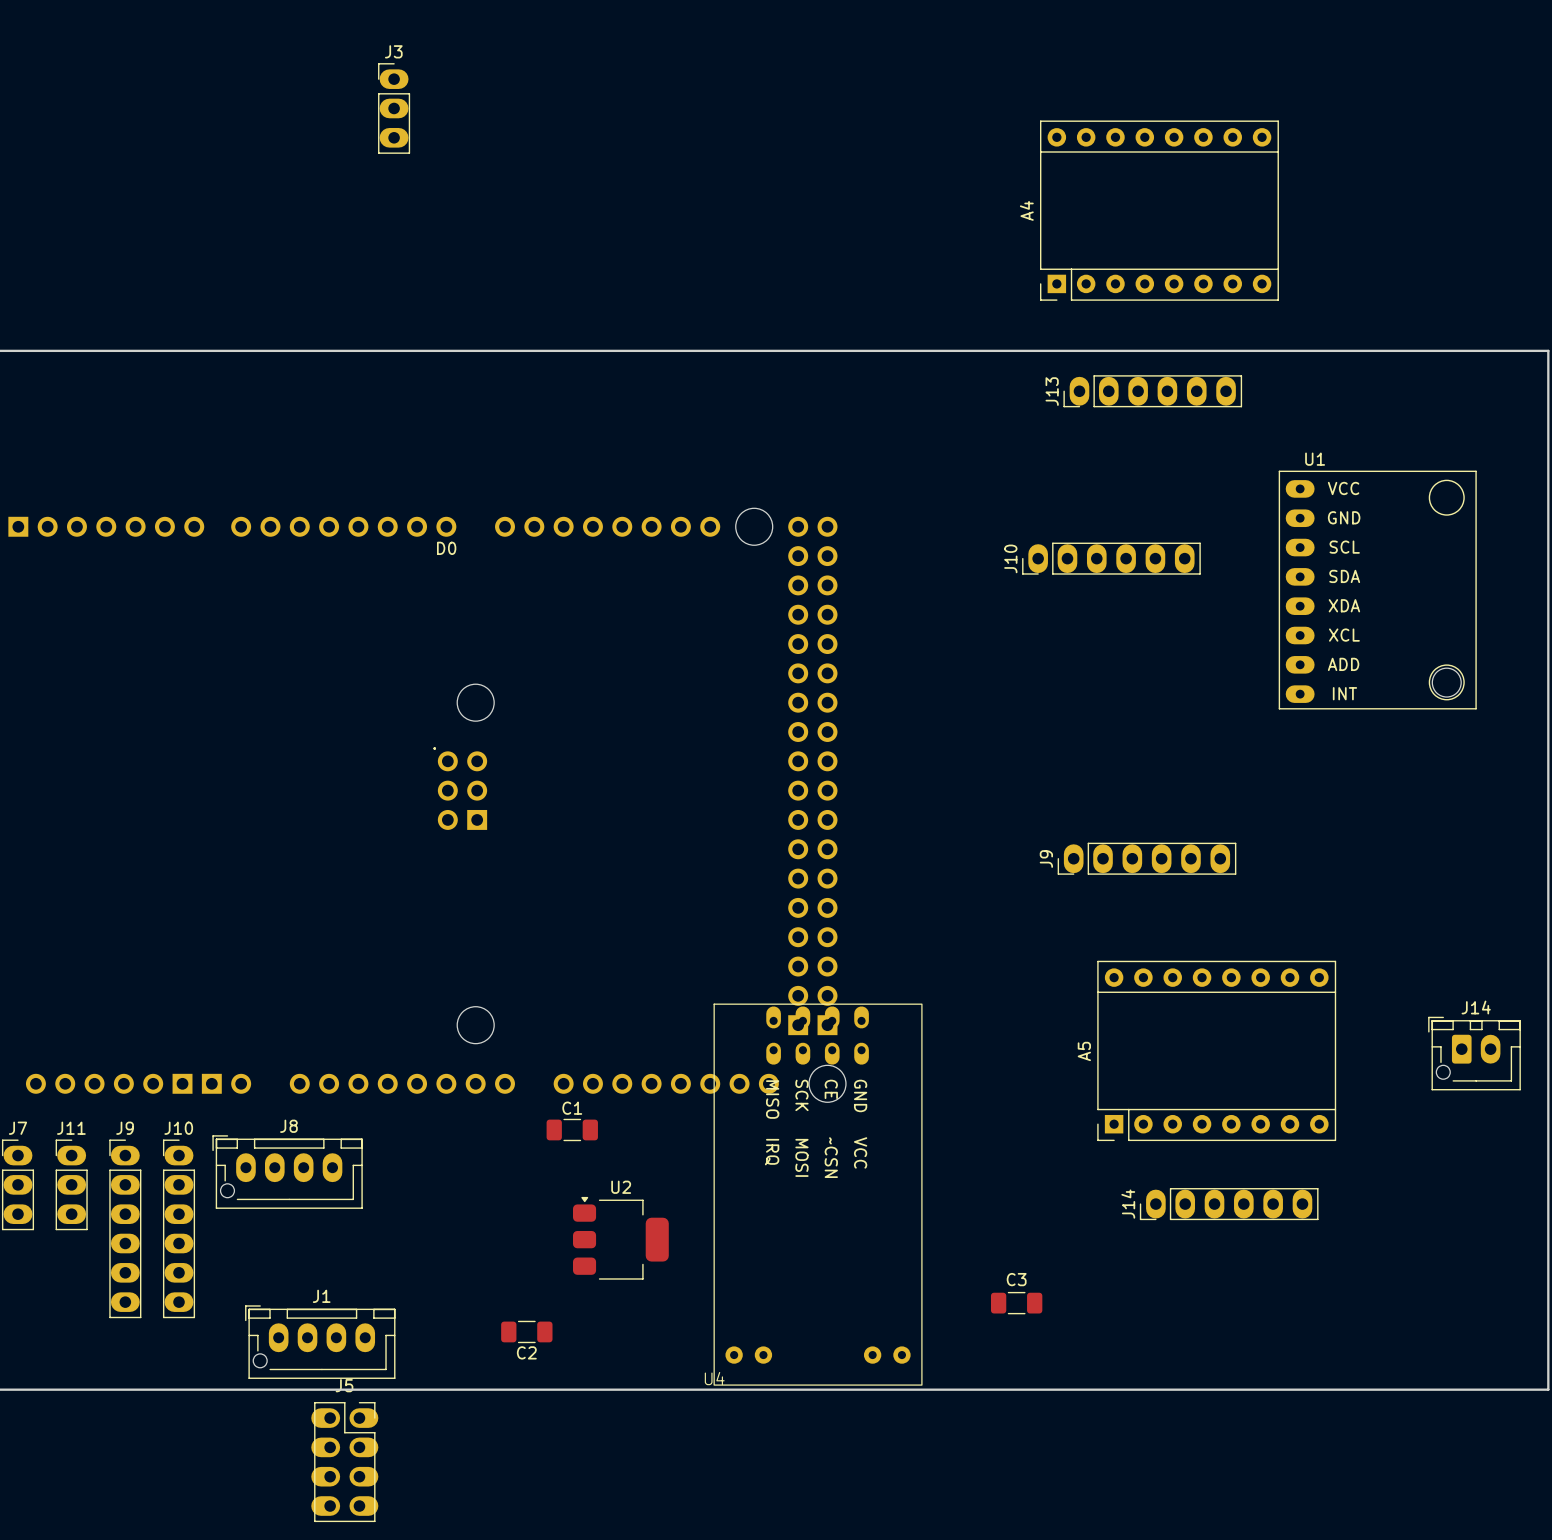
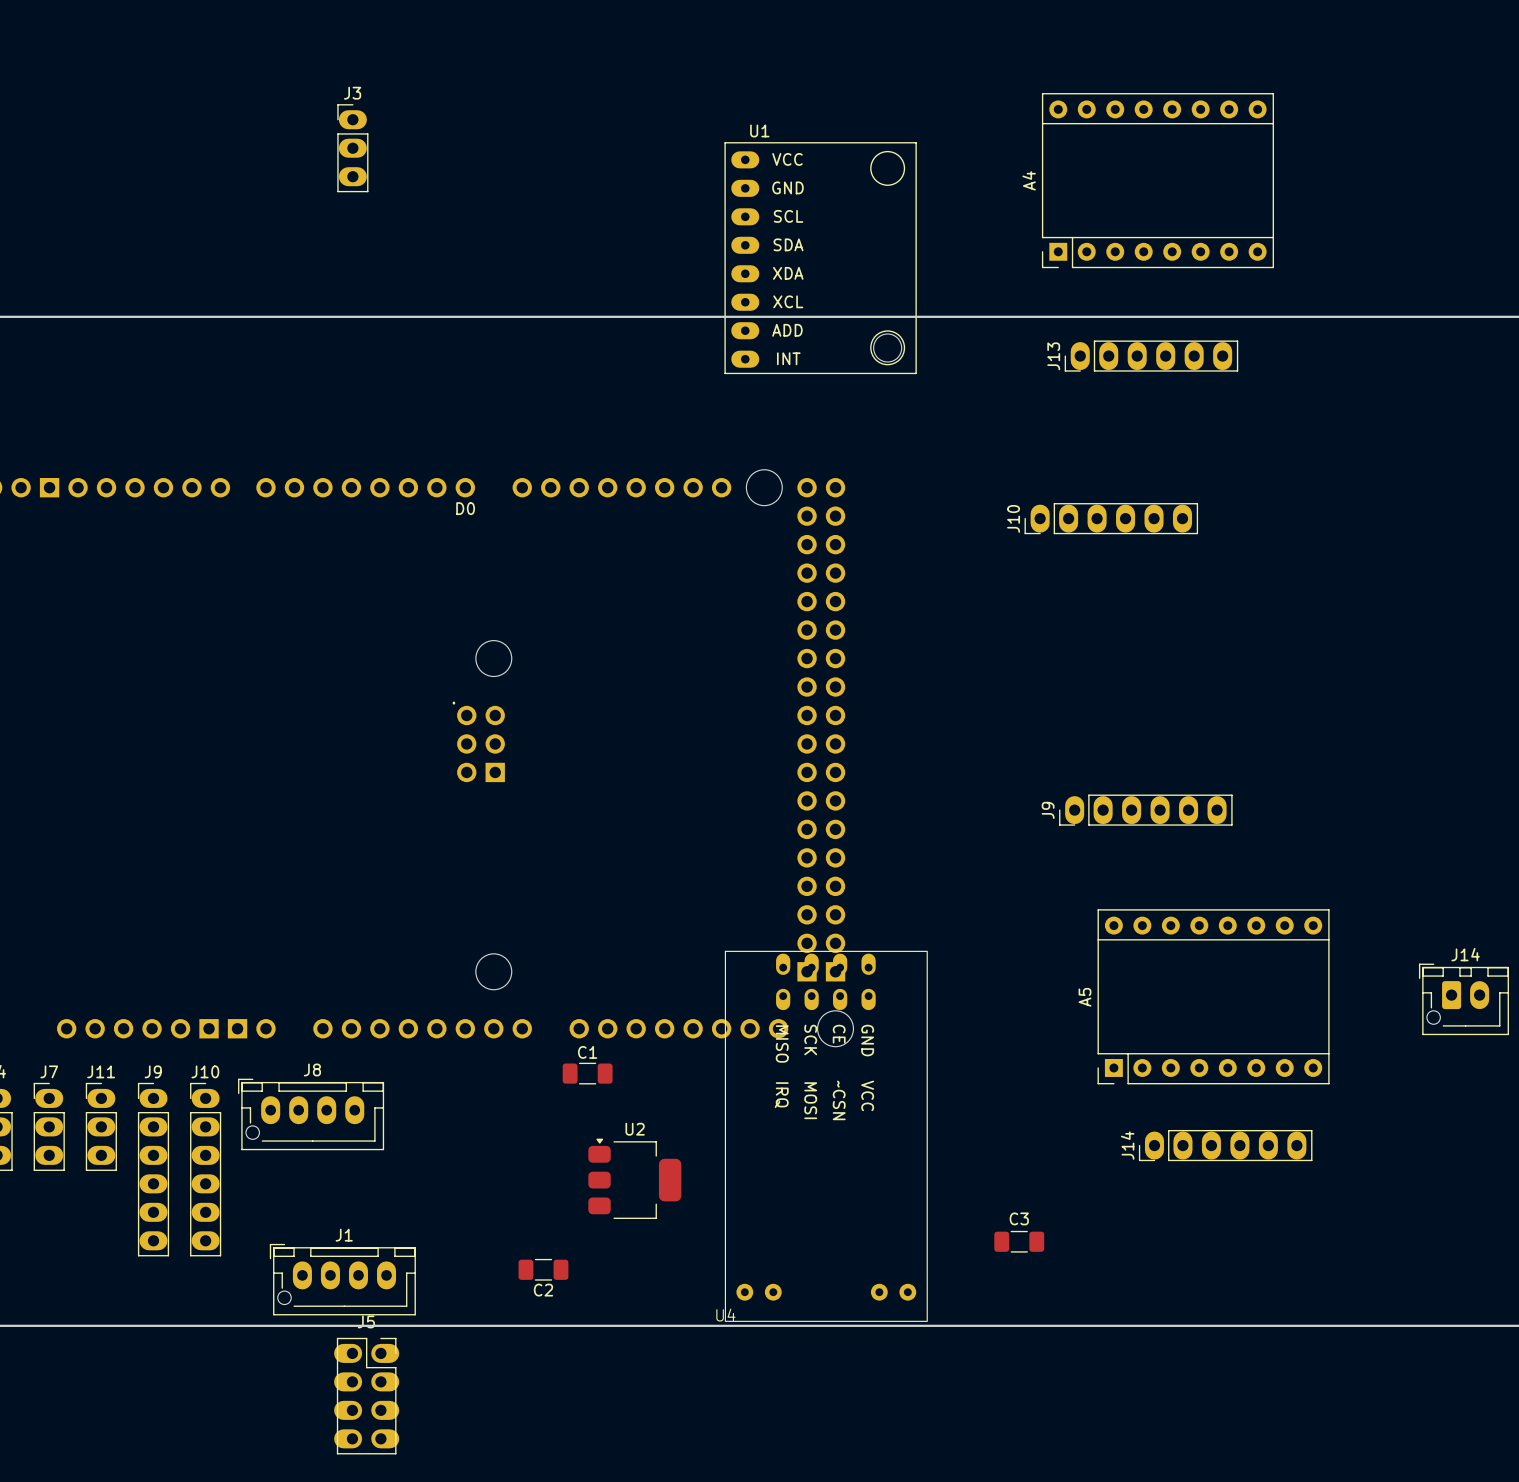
J3 position: (394, 108) -> (352, 148)
U1 position: (1377, 590) -> (820, 258)

